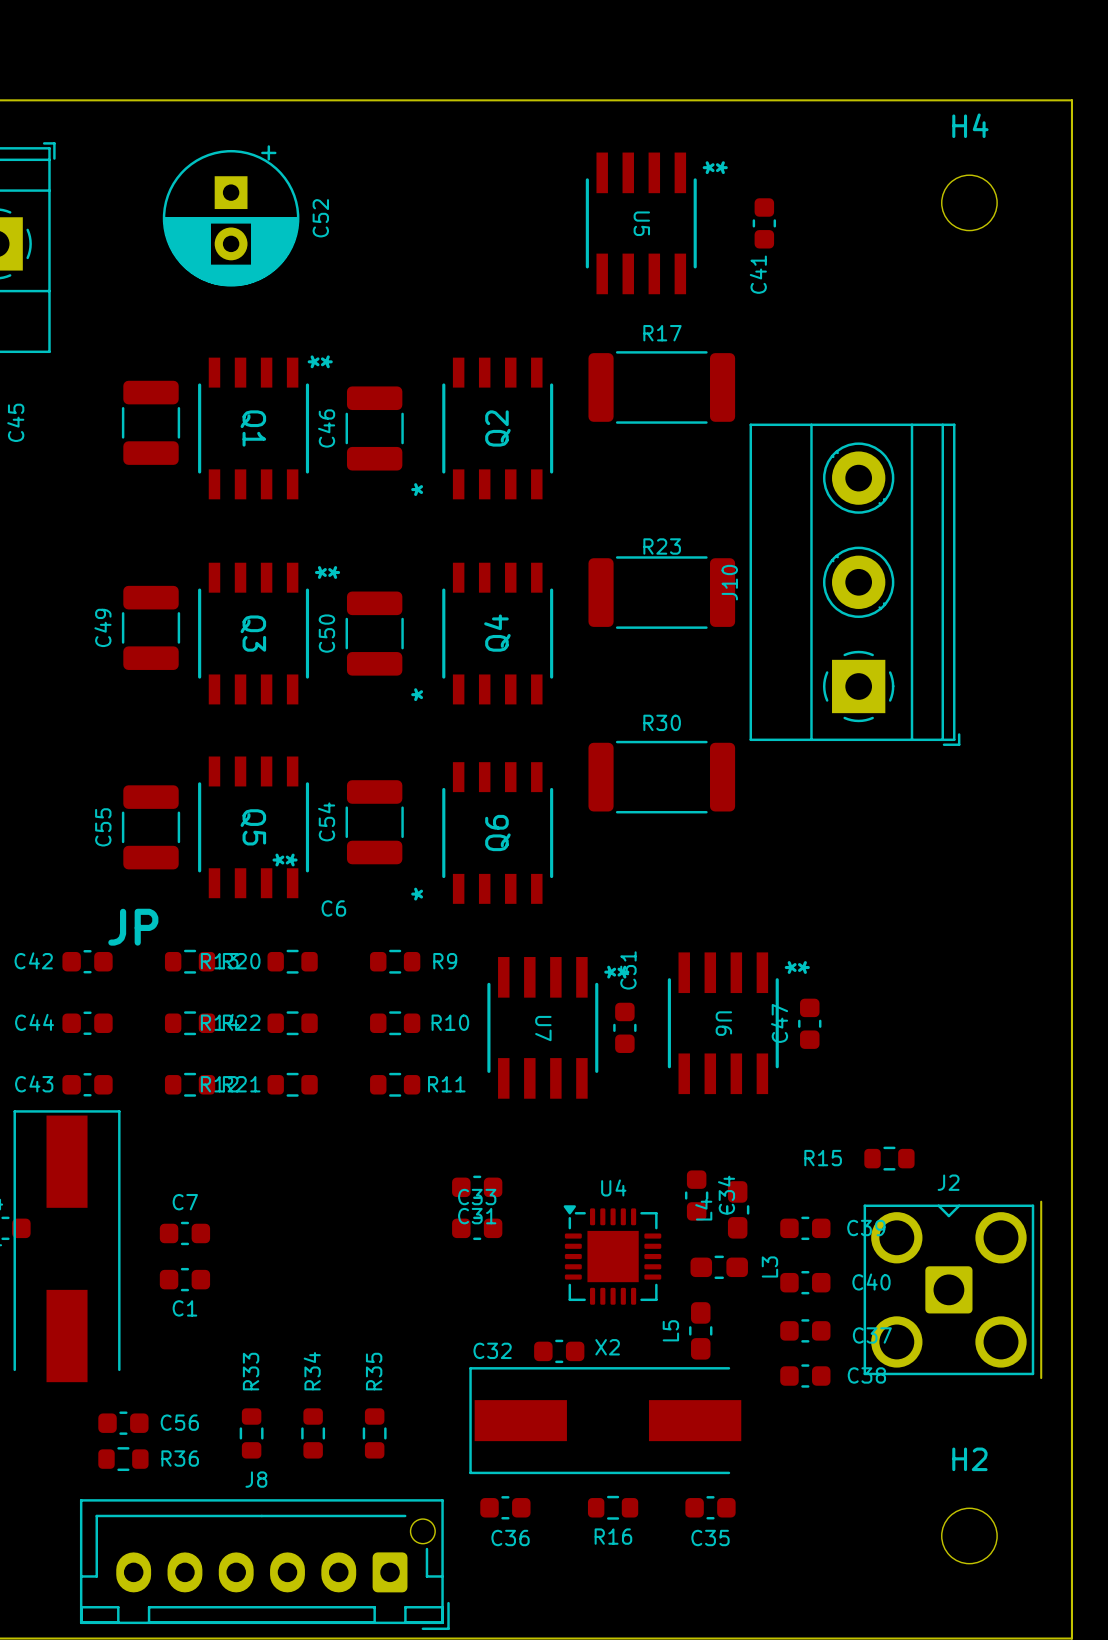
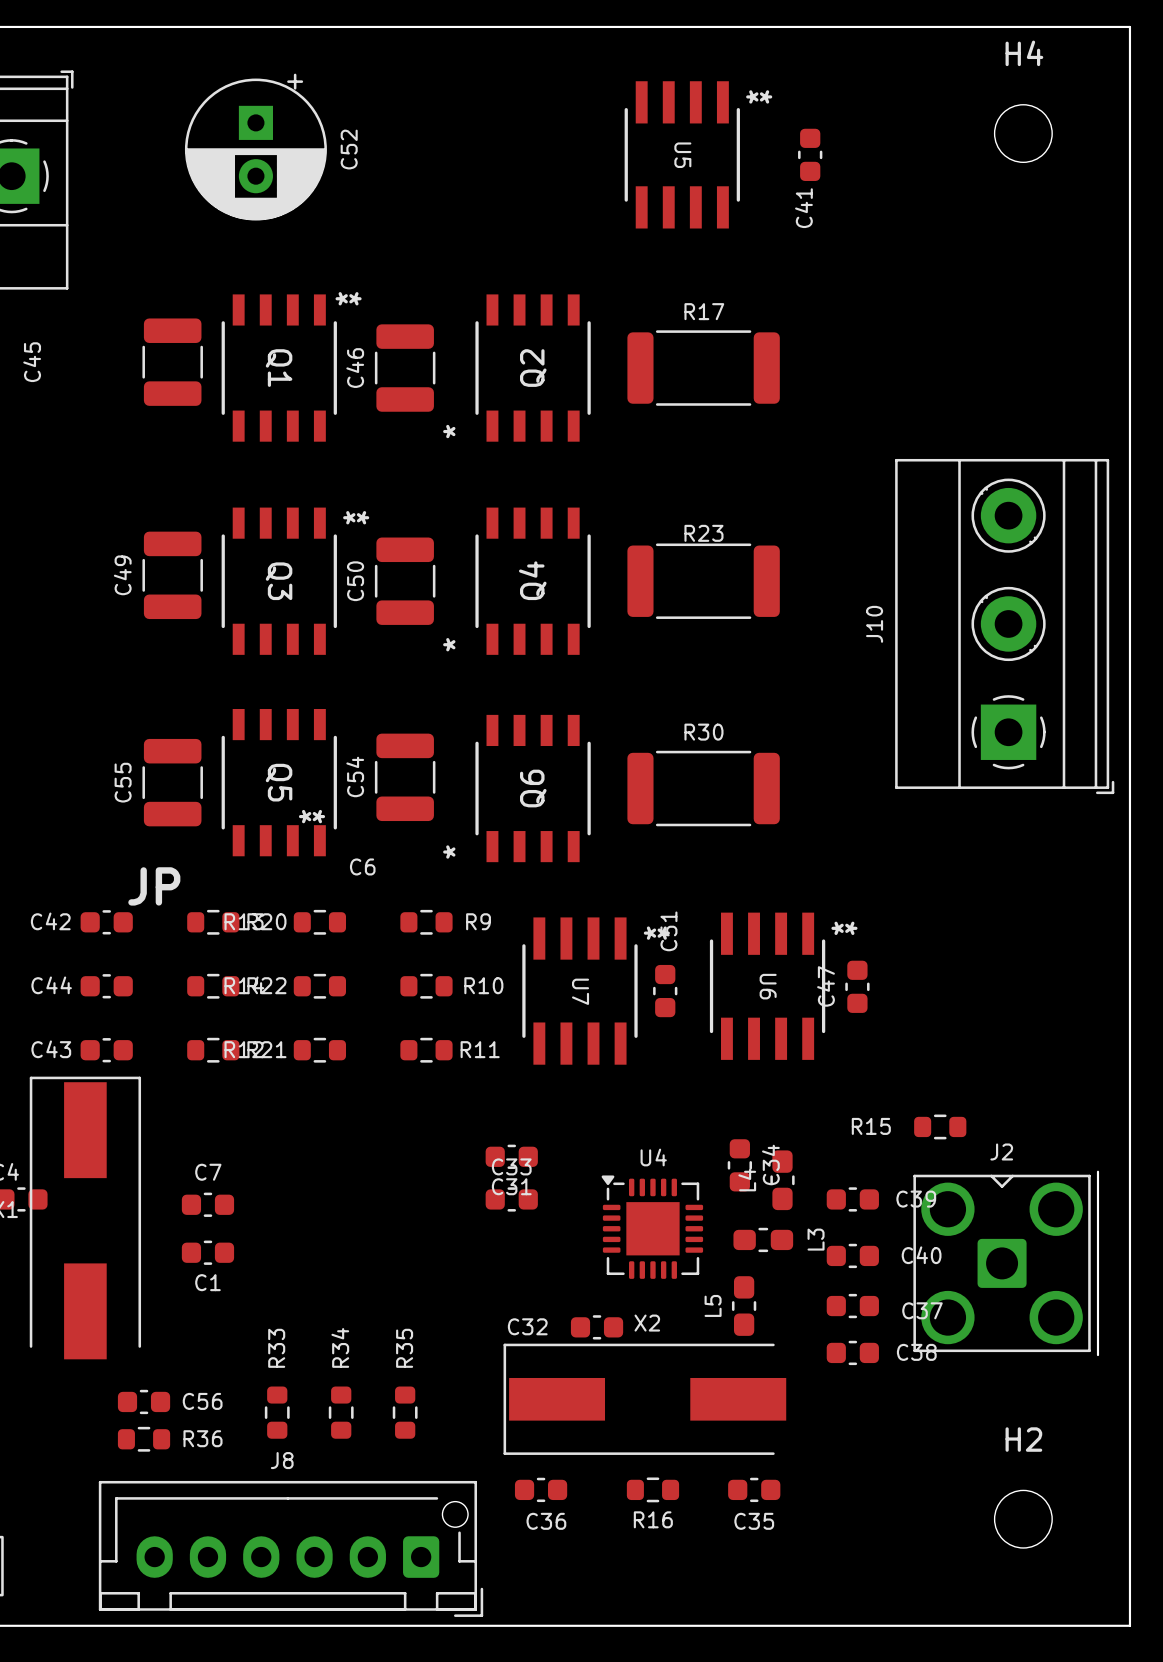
R17 position: (661, 387) -> (703, 368)
J10 position: (854, 584) -> (1004, 626)
R23 position: (661, 592) -> (703, 581)
R30 position: (661, 777) -> (703, 788)

